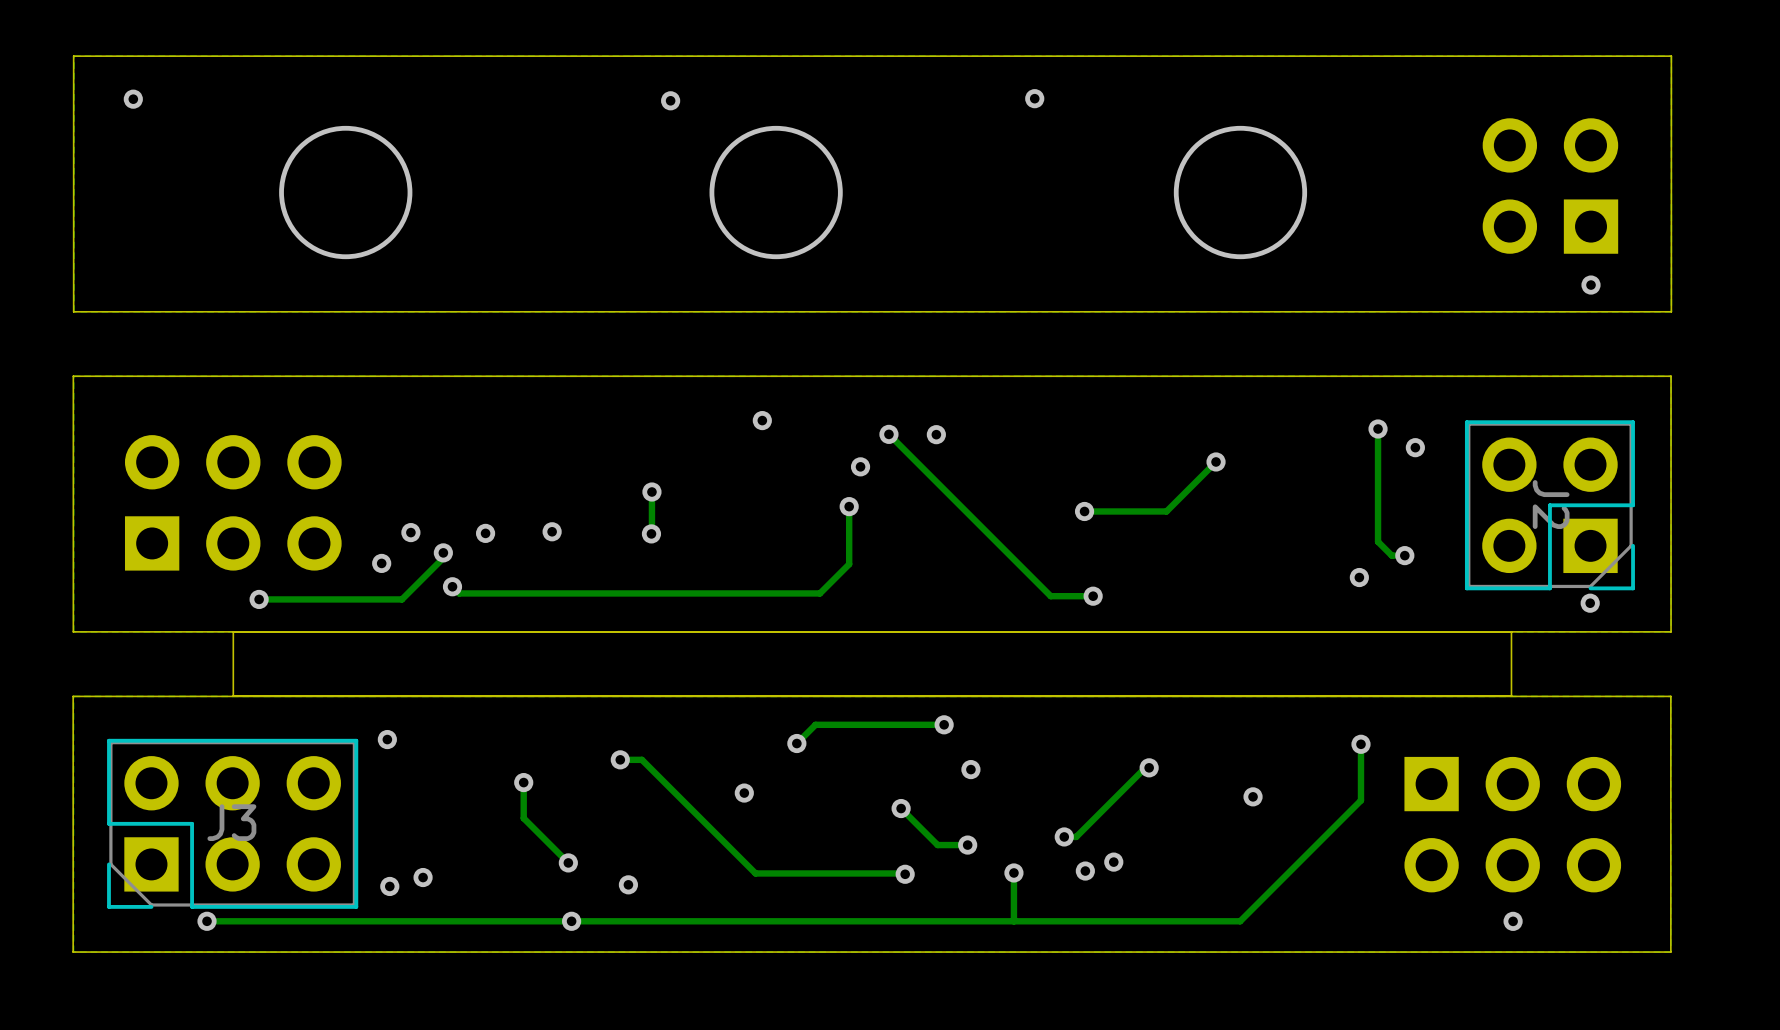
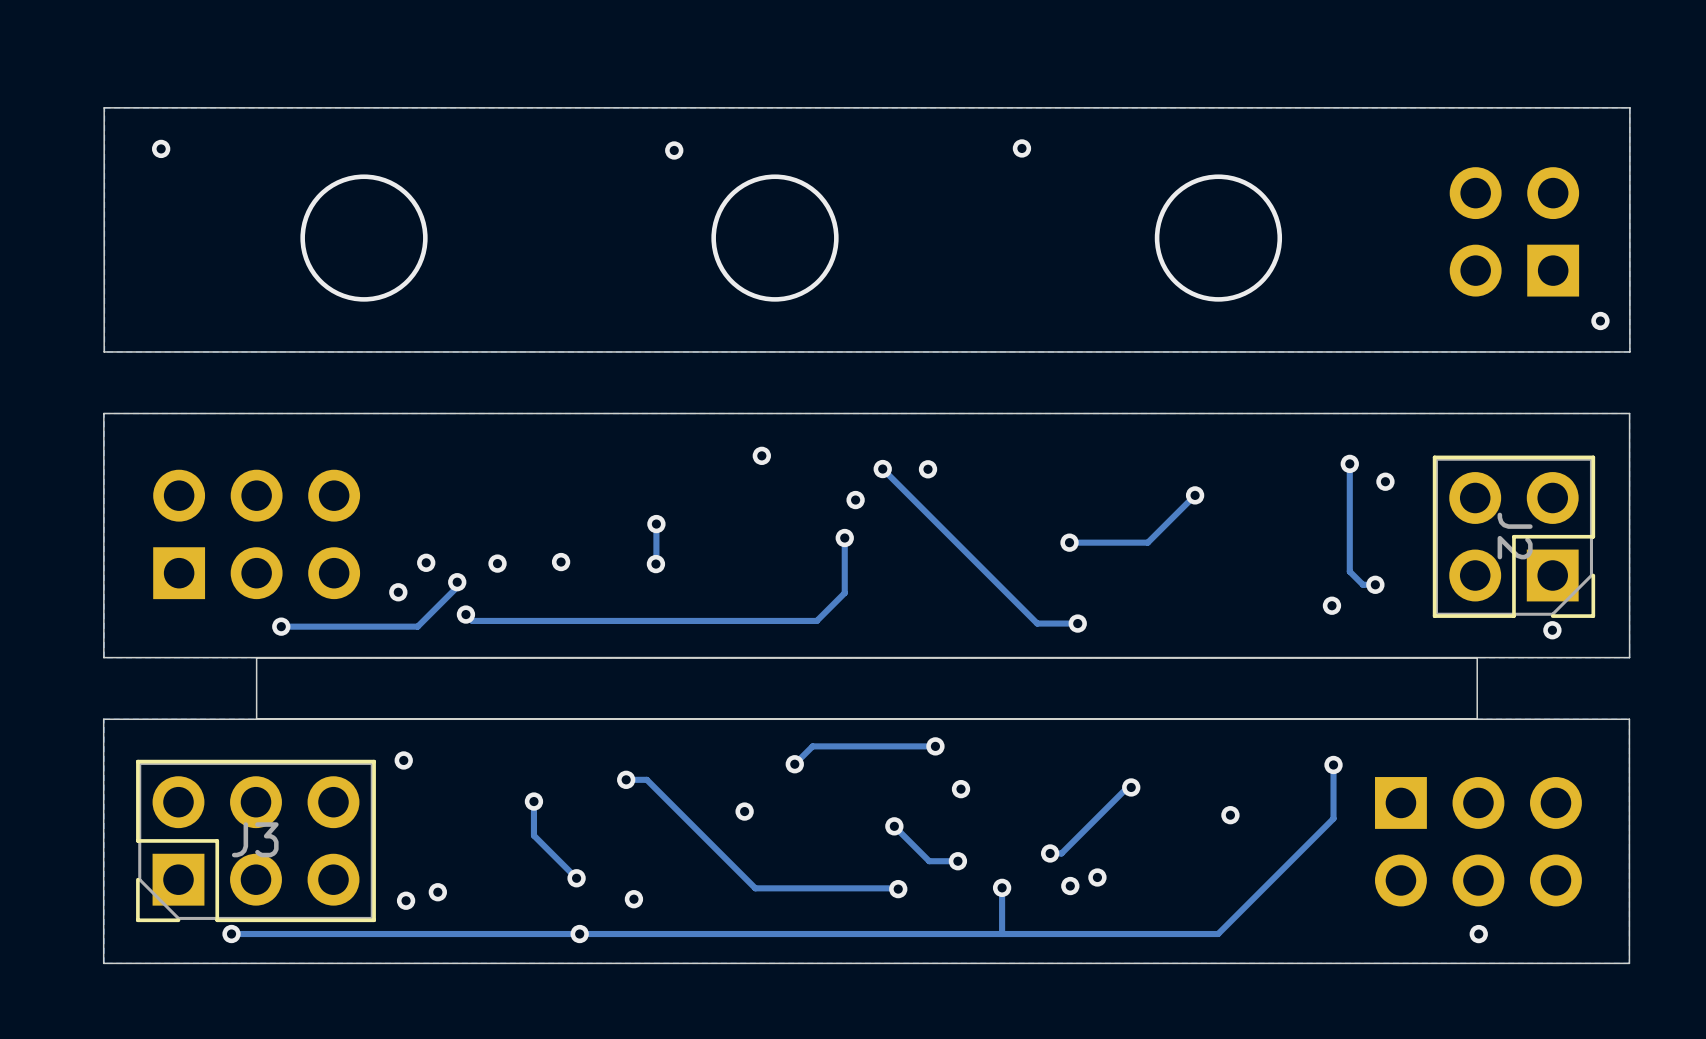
via position: (1591, 285) -> (1600, 320)

